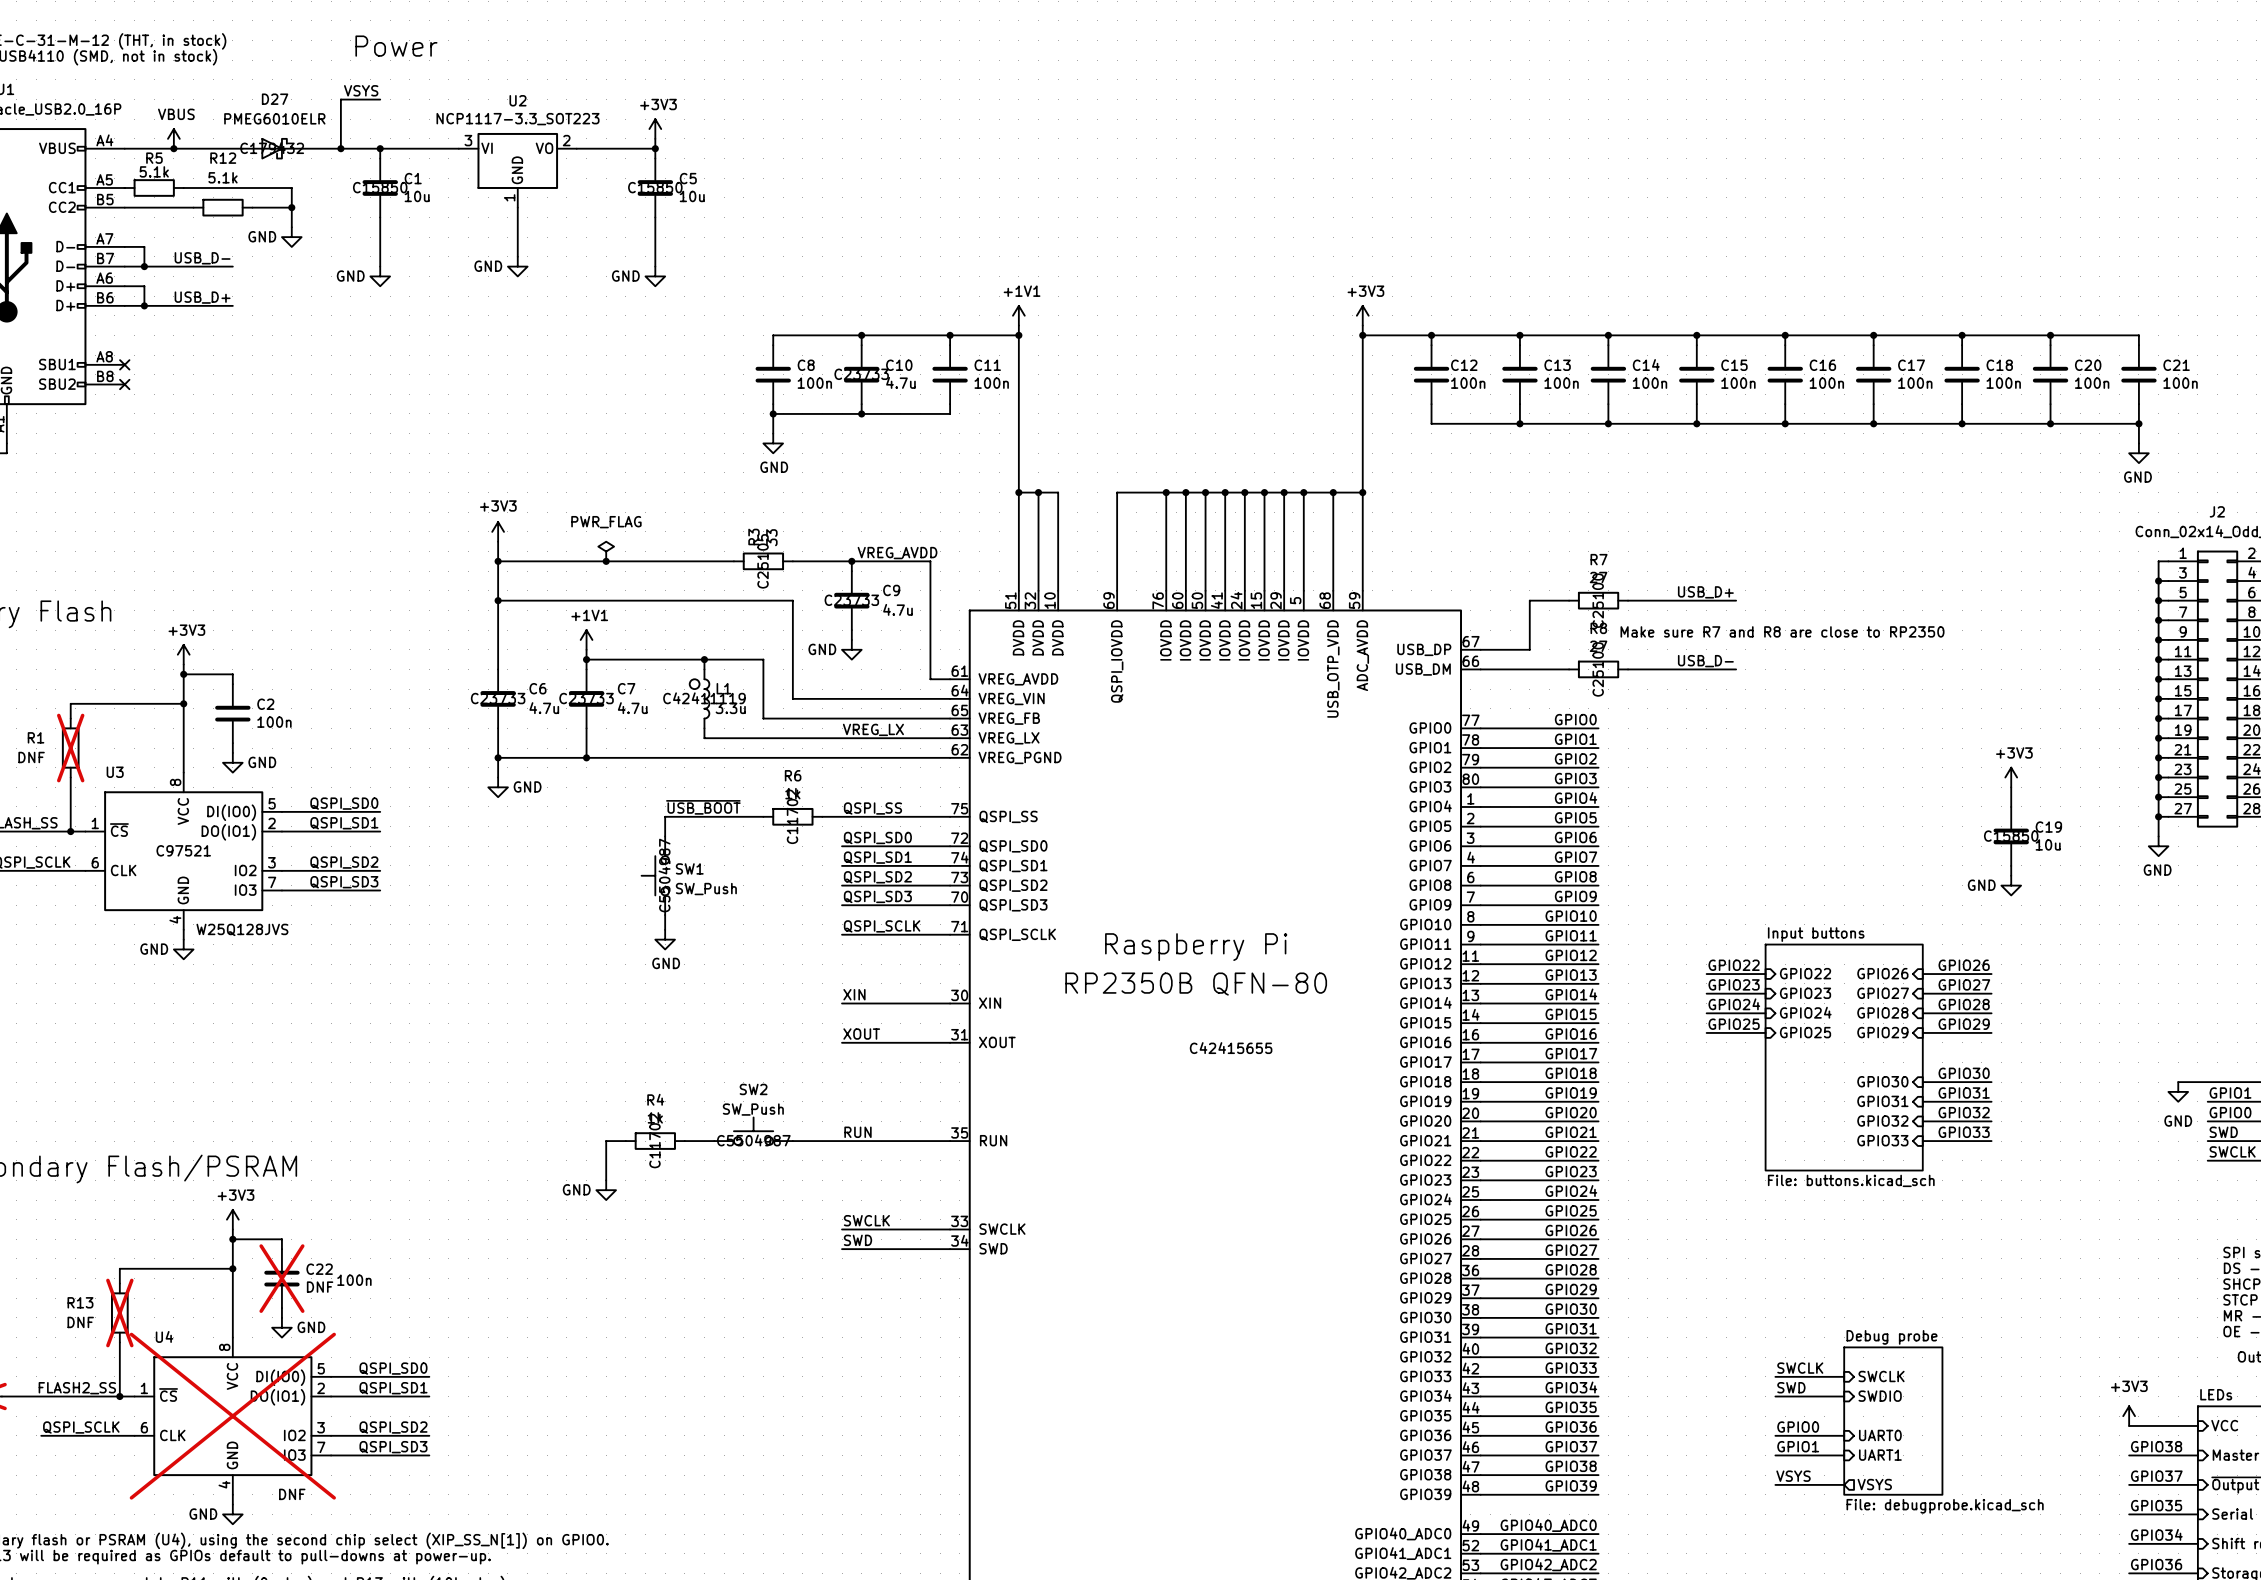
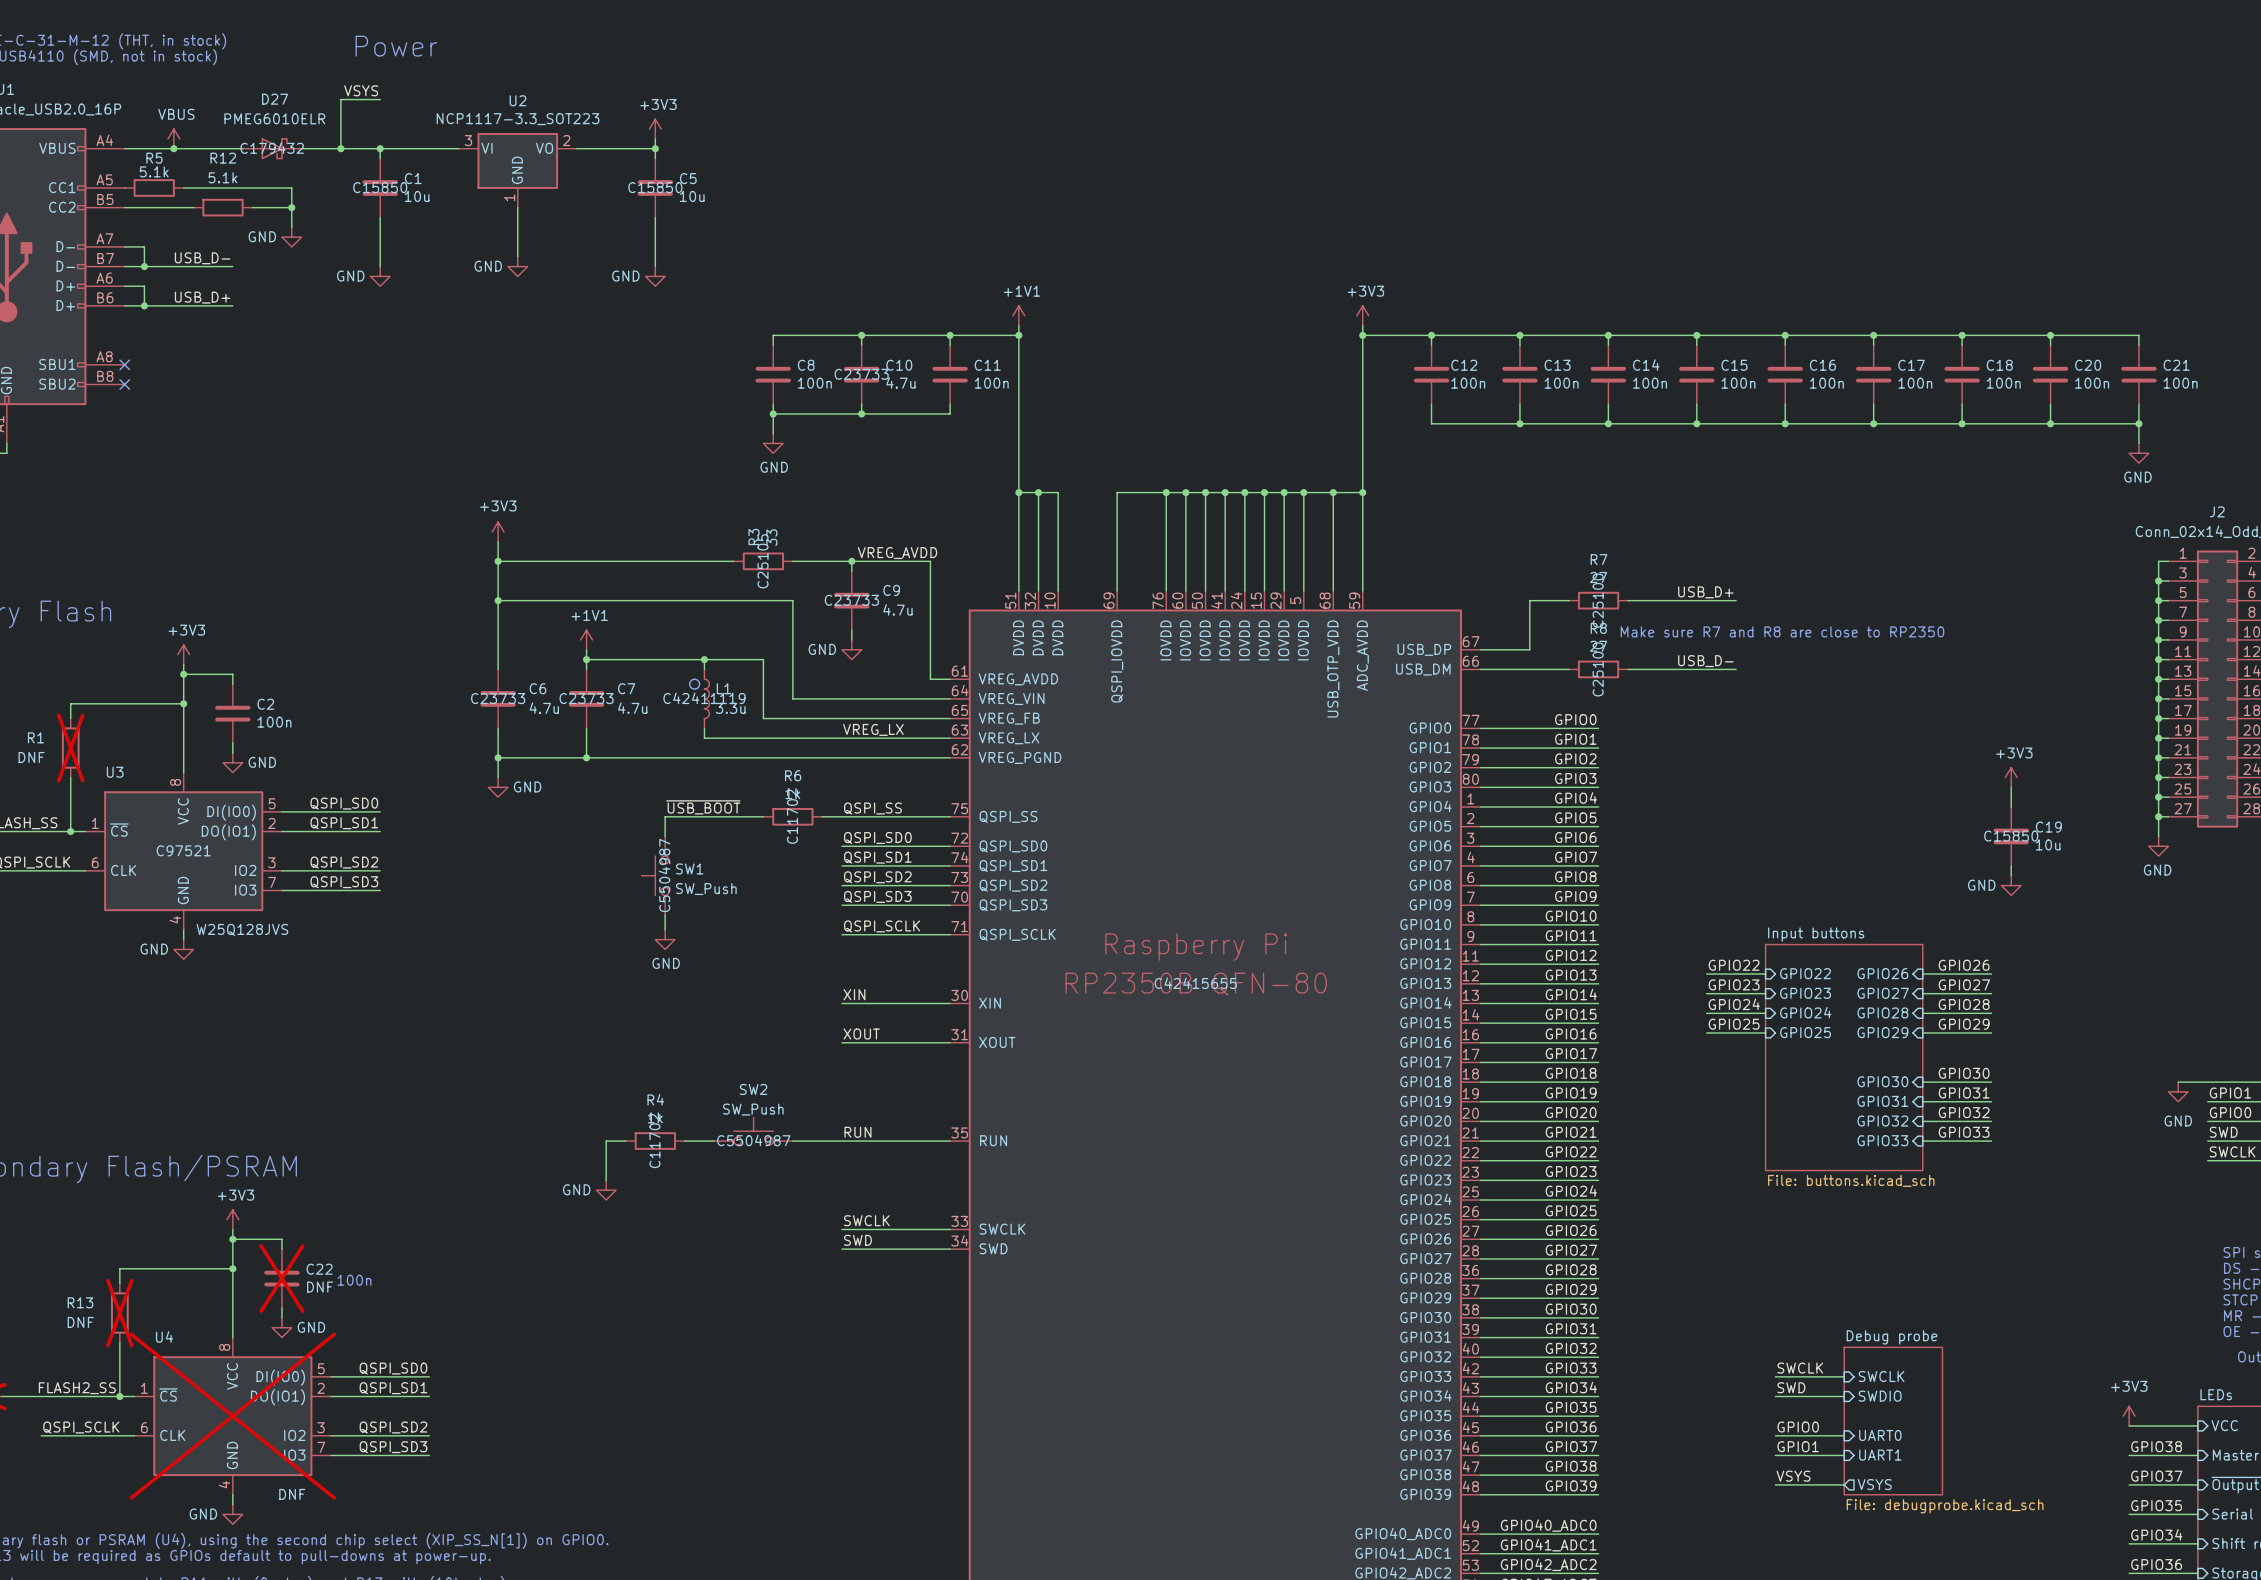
power symbol: PWR_FLAG (606, 551) -> none
junction: (606, 561) -> none
part text position: C42415655 (1231, 1048) -> C42415655 (1195, 983)

